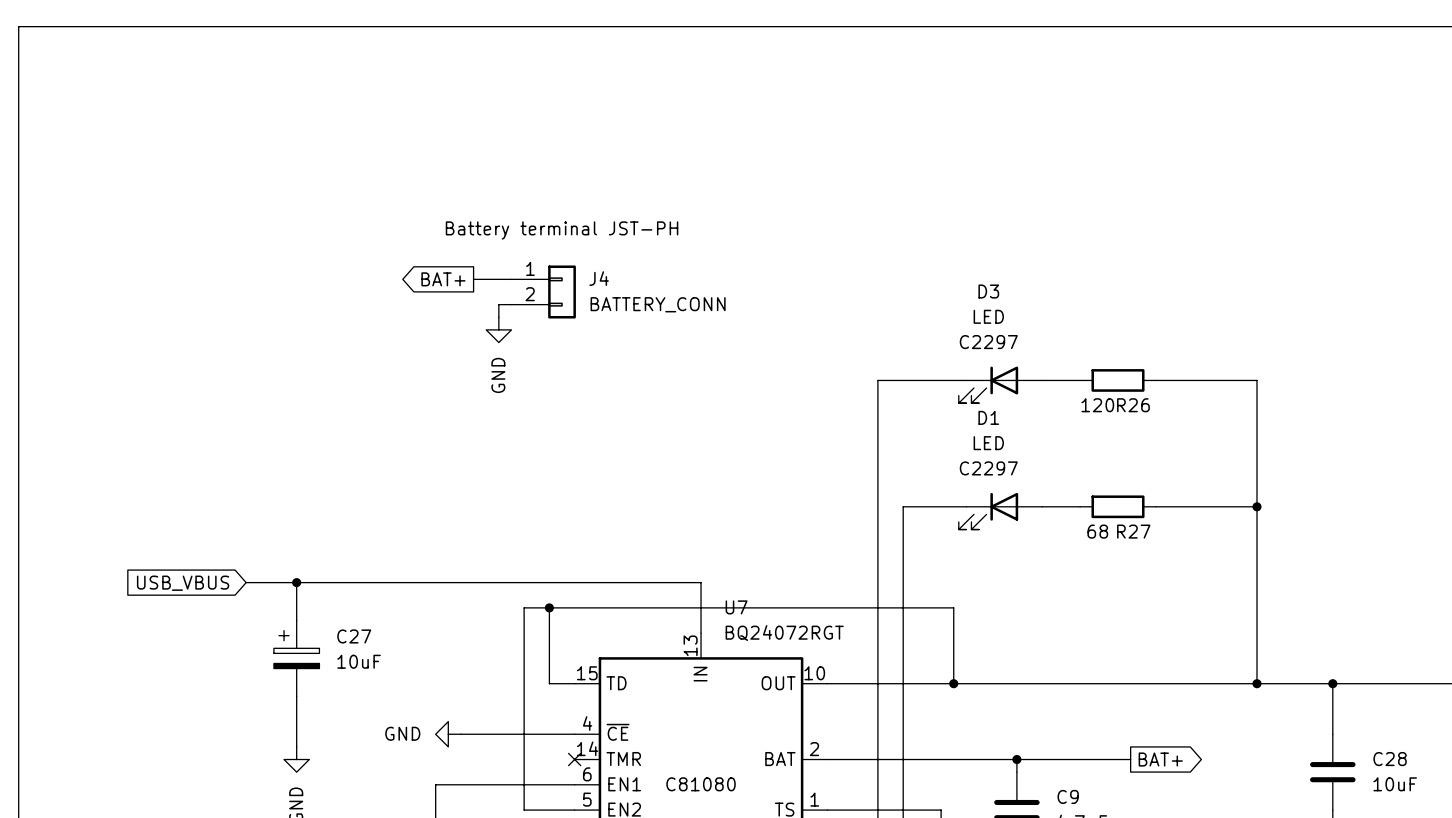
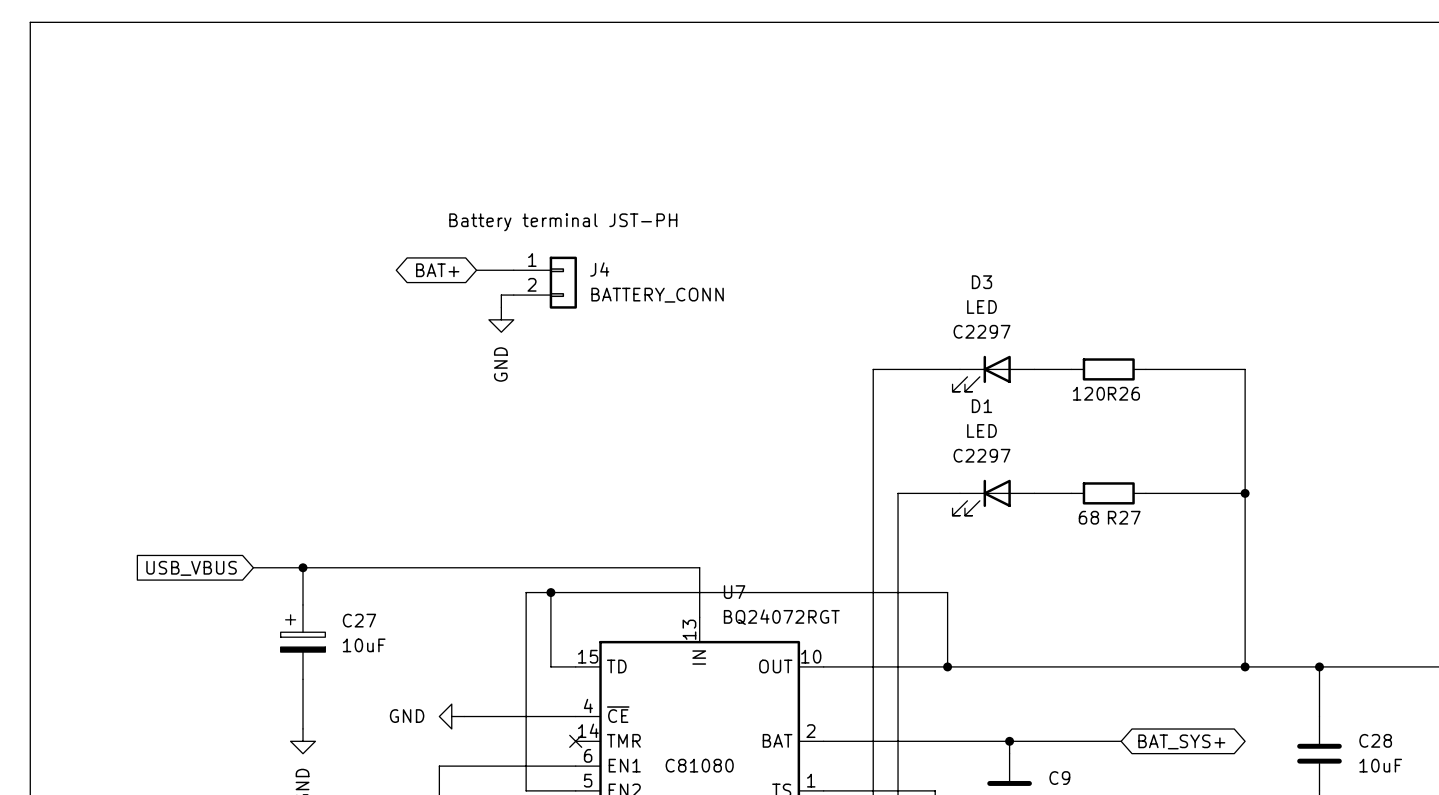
global label shape: output (443, 279) -> bidirectional (437, 270)
global label shape: output (1160, 759) -> bidirectional (1181, 741)
global label: BAT+ (1160, 759) -> BAT_SYS+ (1181, 741)

